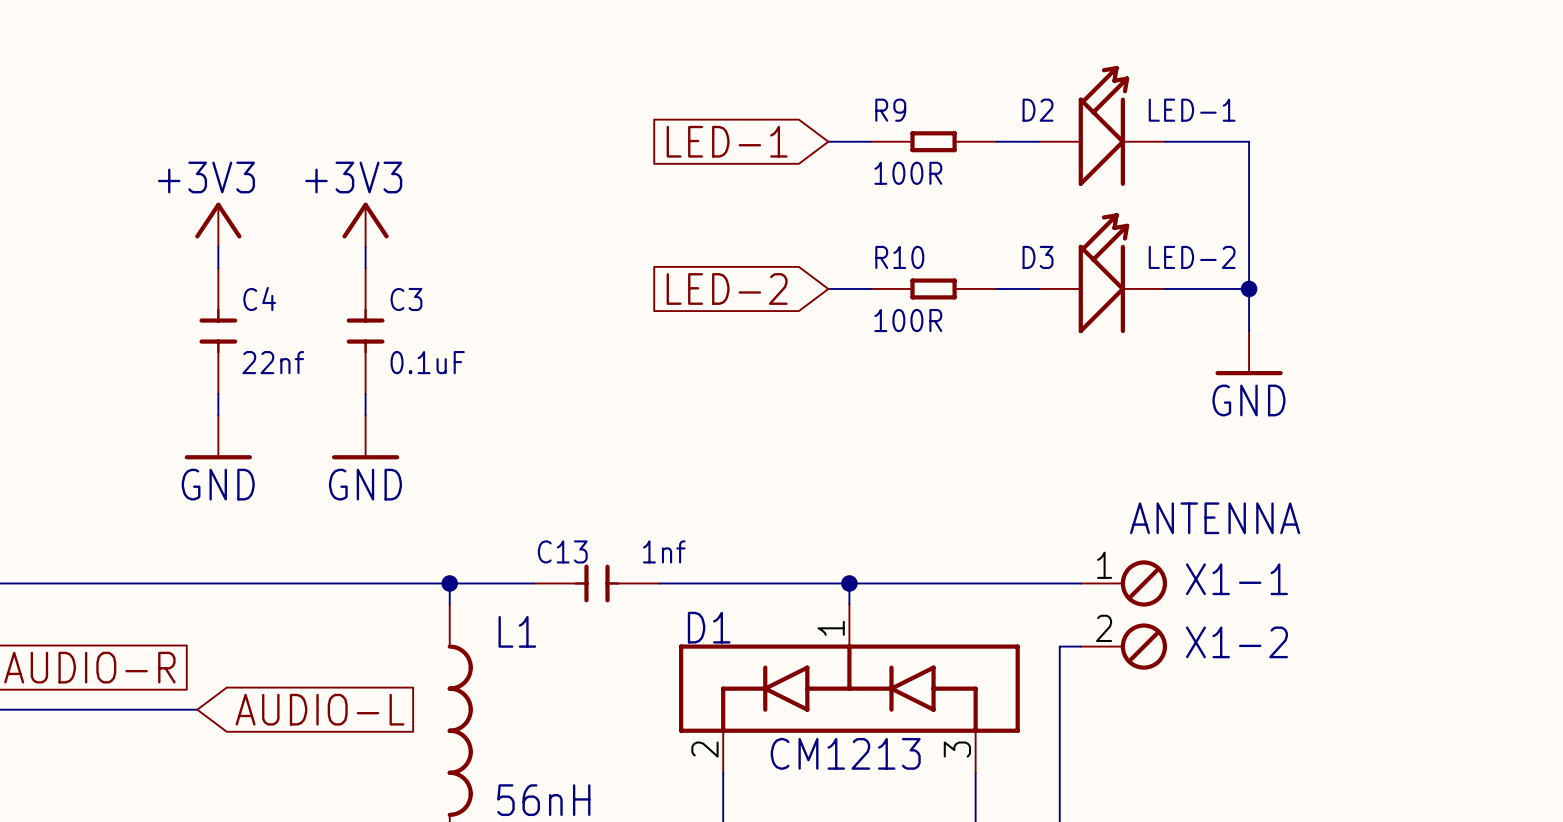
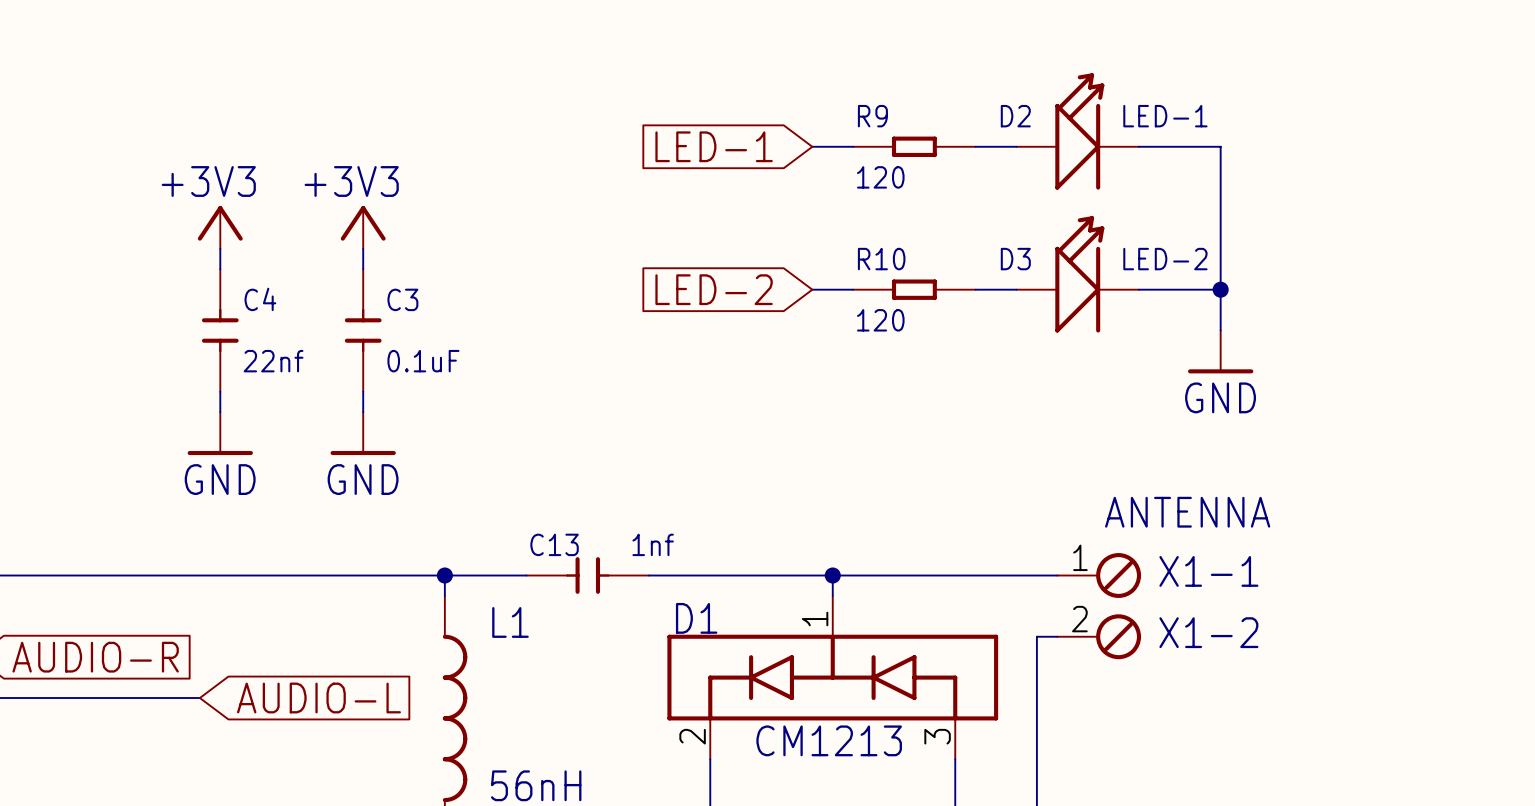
R9 value: 100R (908, 173) -> 120 (880, 177)
R10 value: 100R (908, 320) -> 120 (880, 320)

